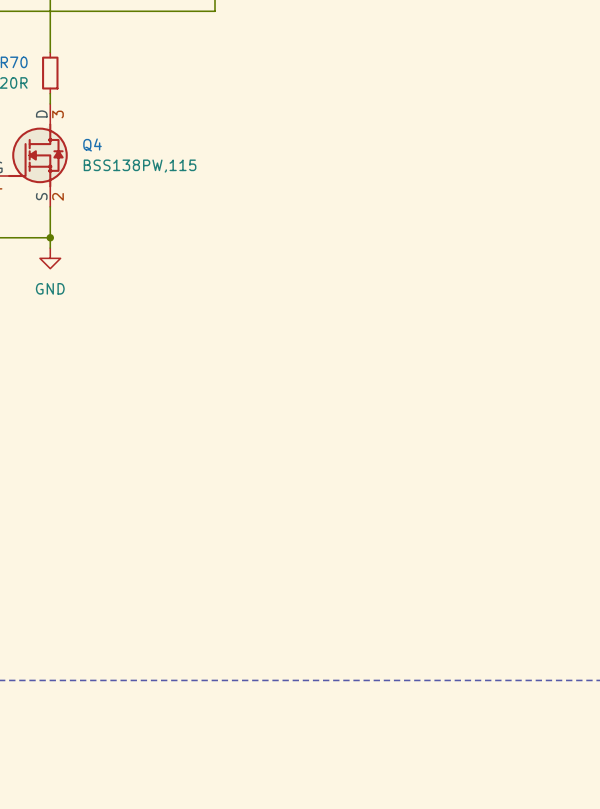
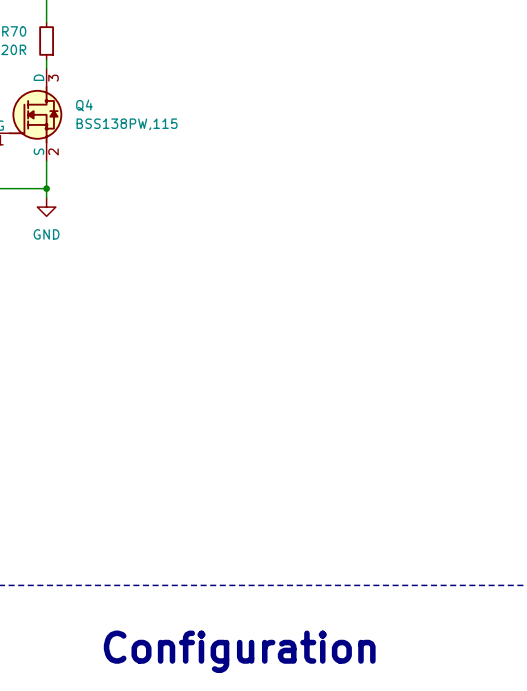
text: none -> Configuration (239, 651)

